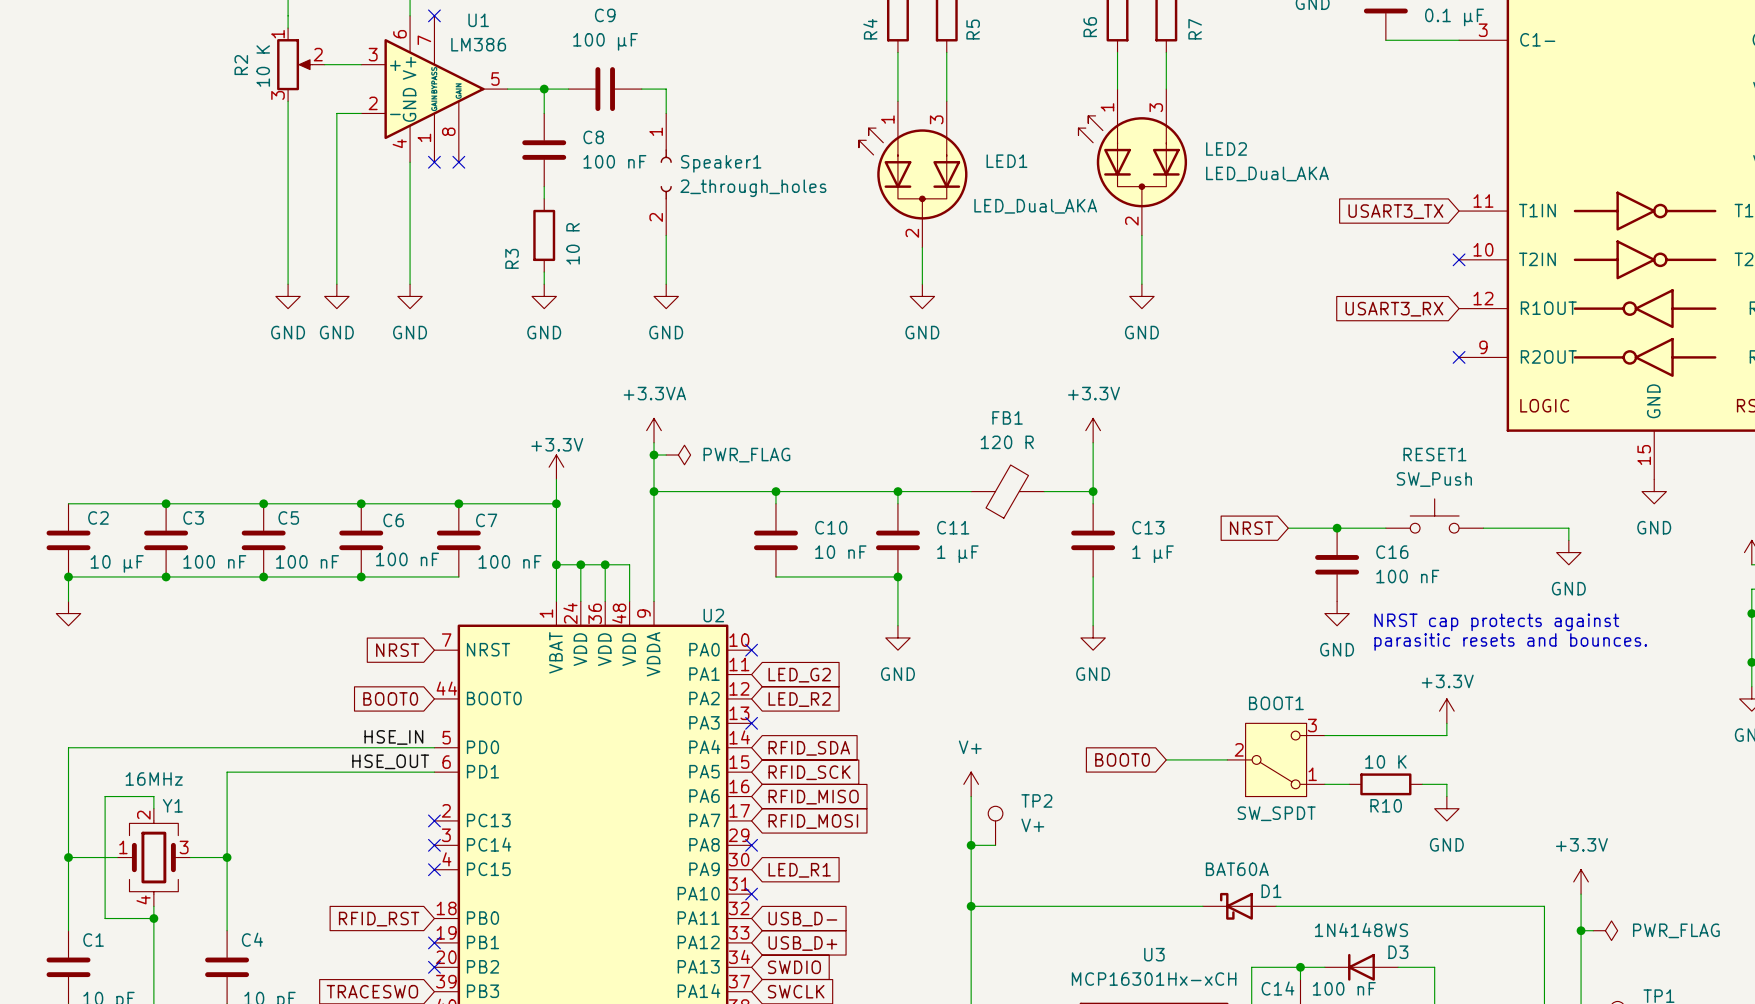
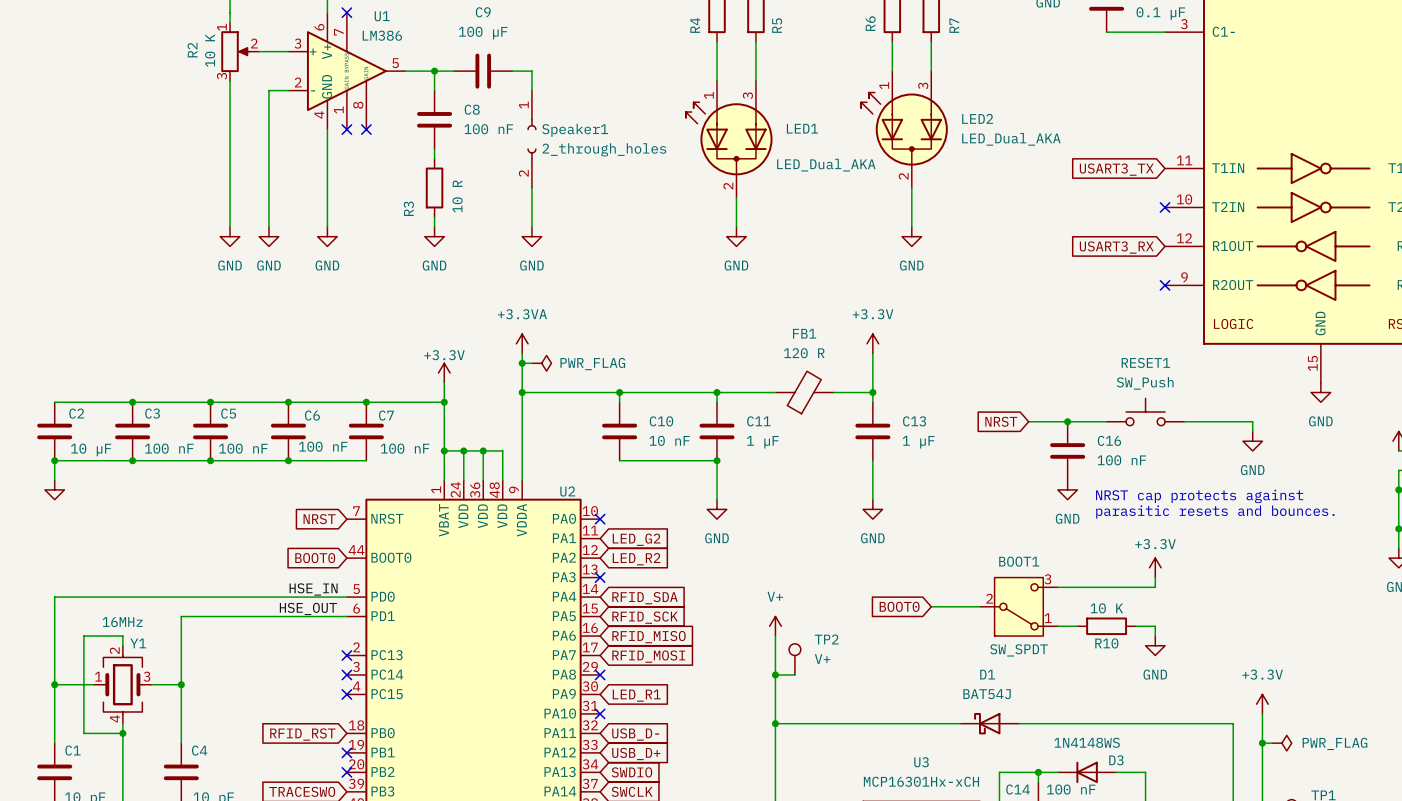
D1 value: BAT60A (1237, 869) -> BAT54J (987, 694)
D1 name position: D1 (1271, 891) -> D1 (987, 674)

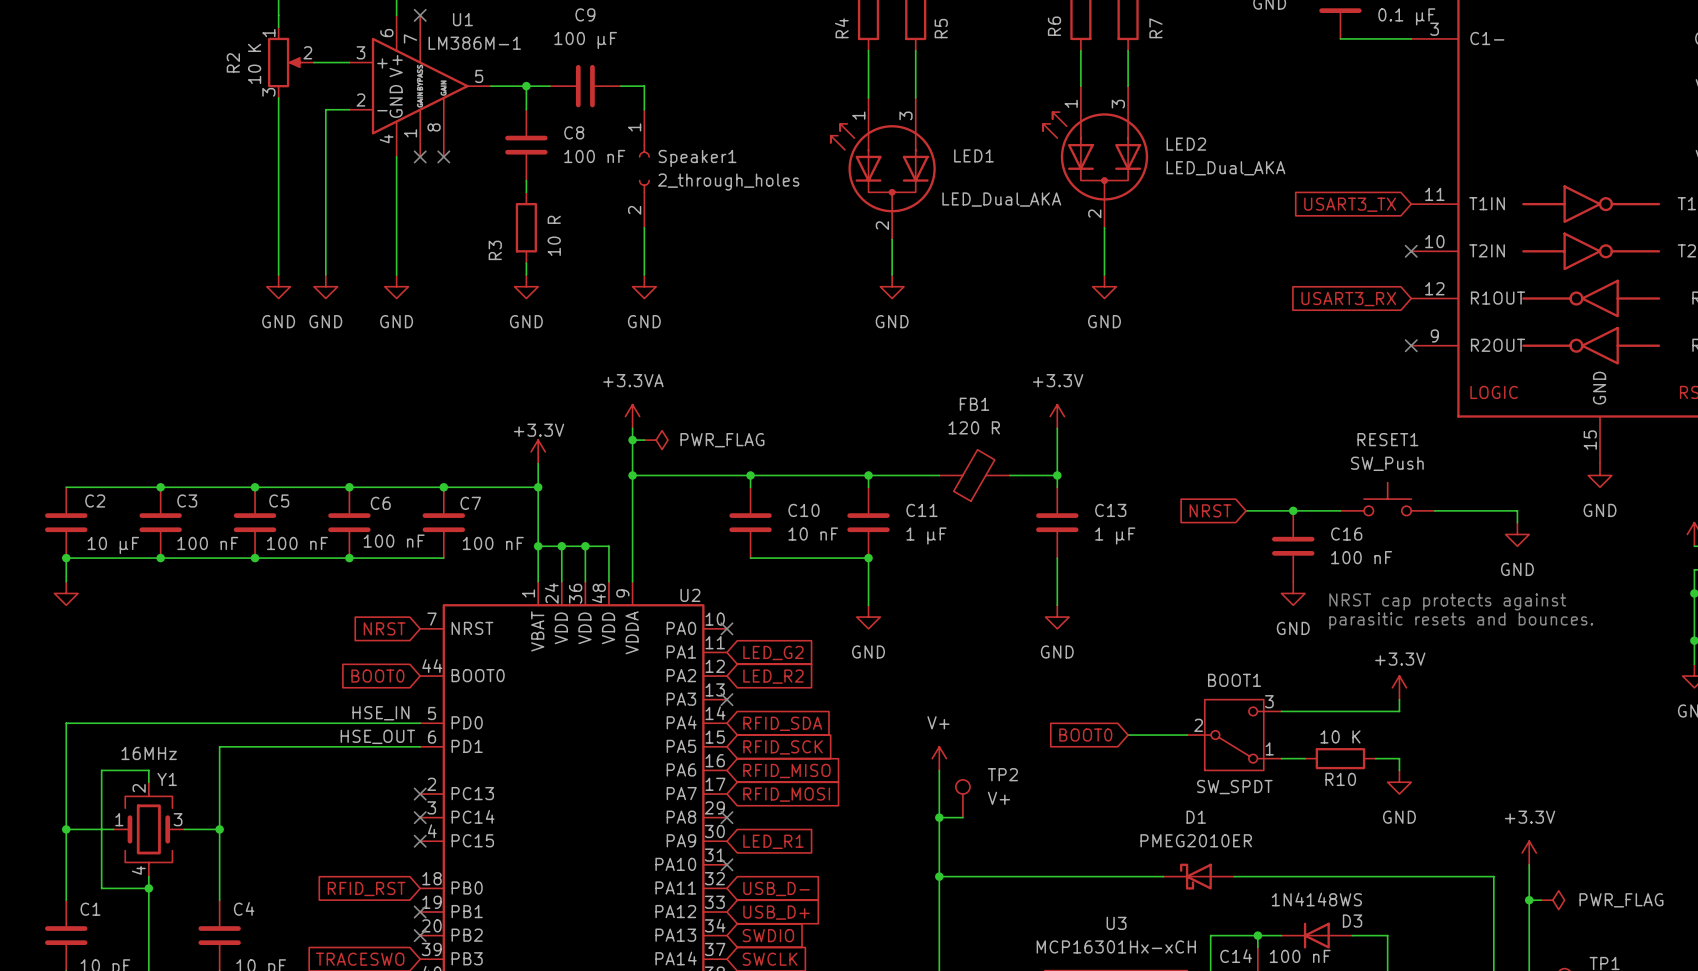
U1 value: LM386 (382, 35) -> LM386M-1 (474, 43)
D1 value: BAT54J (987, 694) -> PMEG2010ER (1196, 840)

